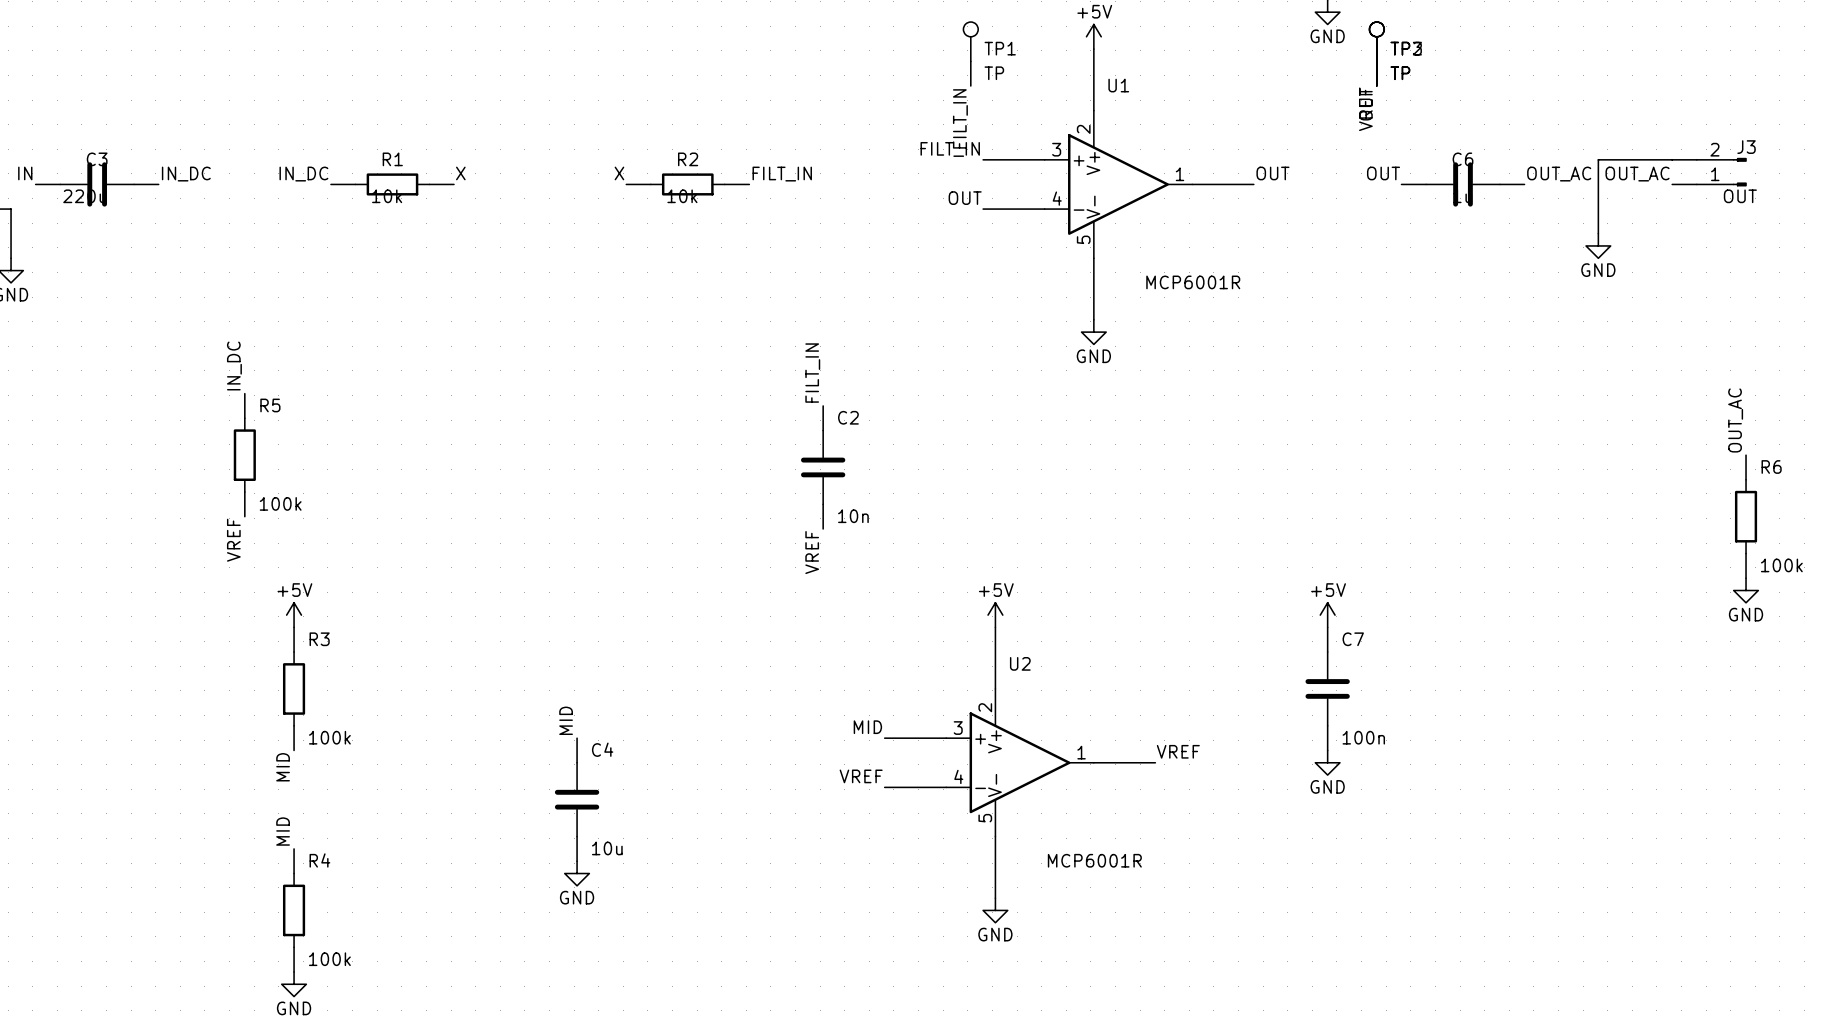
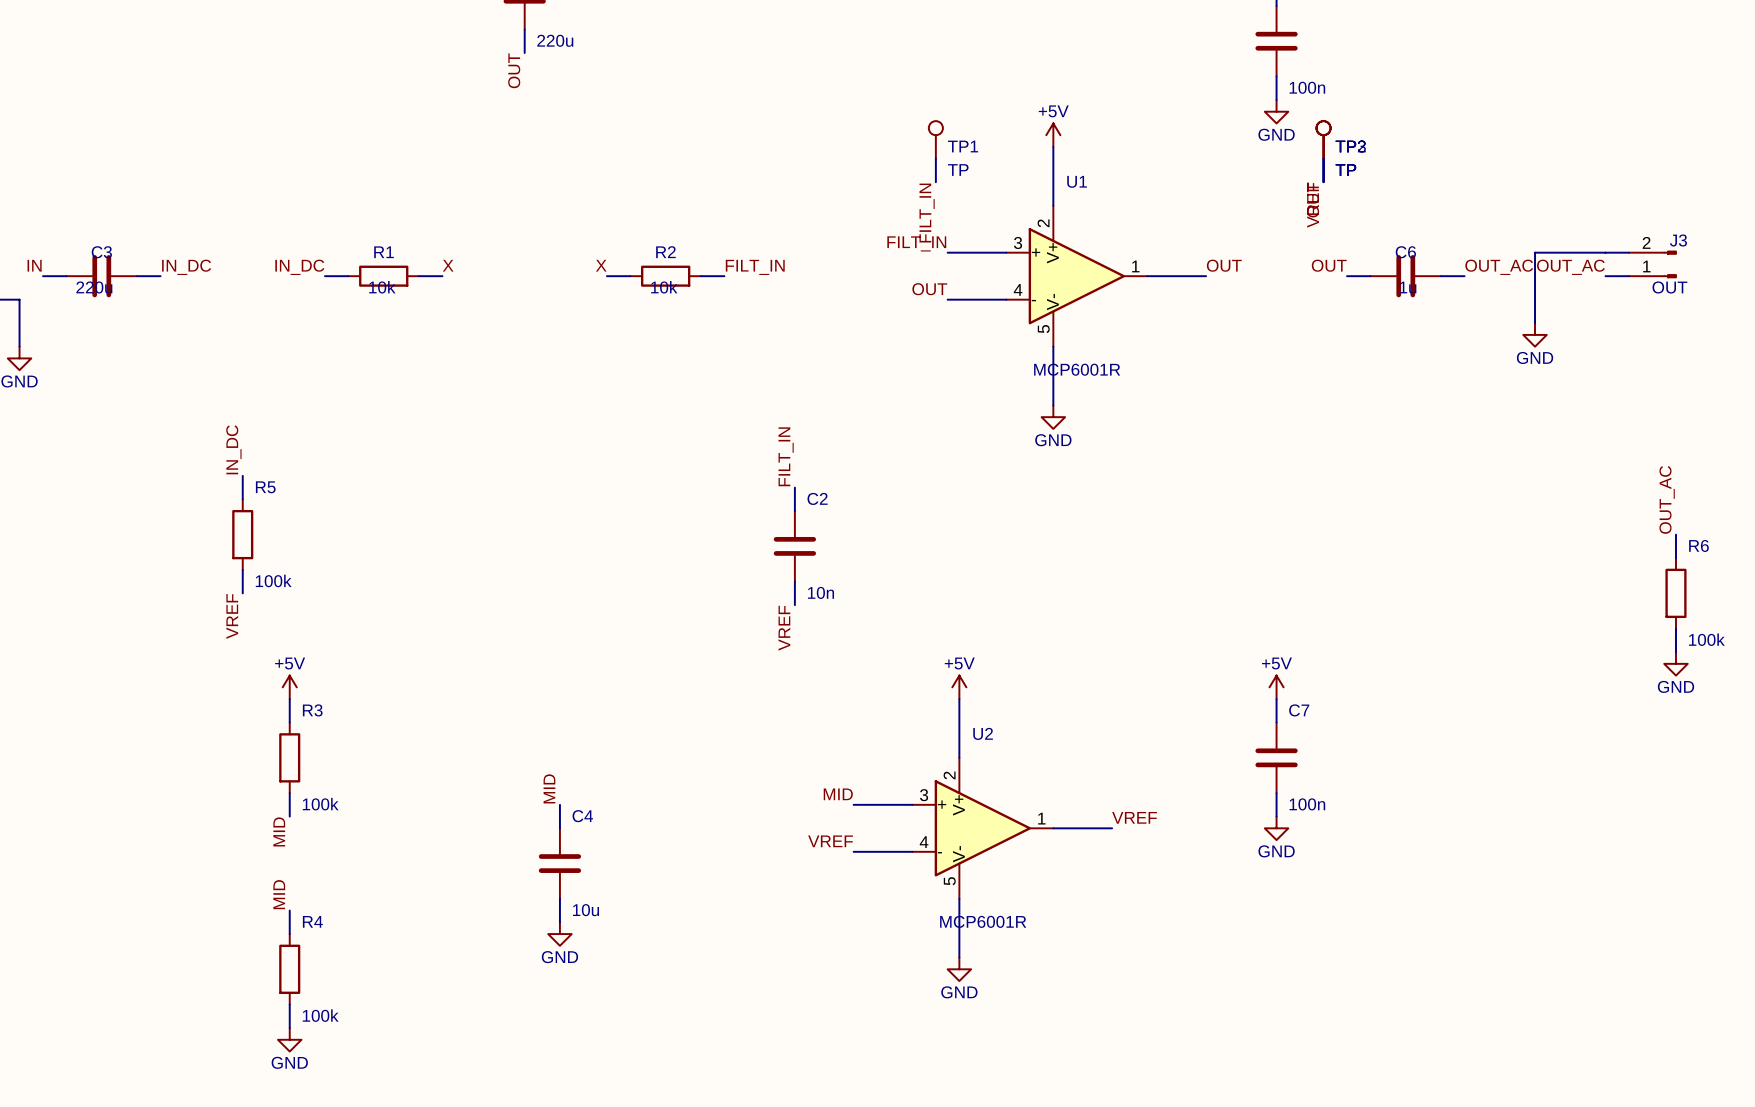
U1 value position: MCP6001R (1193, 282) -> MCP6001R (1077, 369)
U2 value position: MCP6001R (1094, 860) -> MCP6001R (983, 921)

